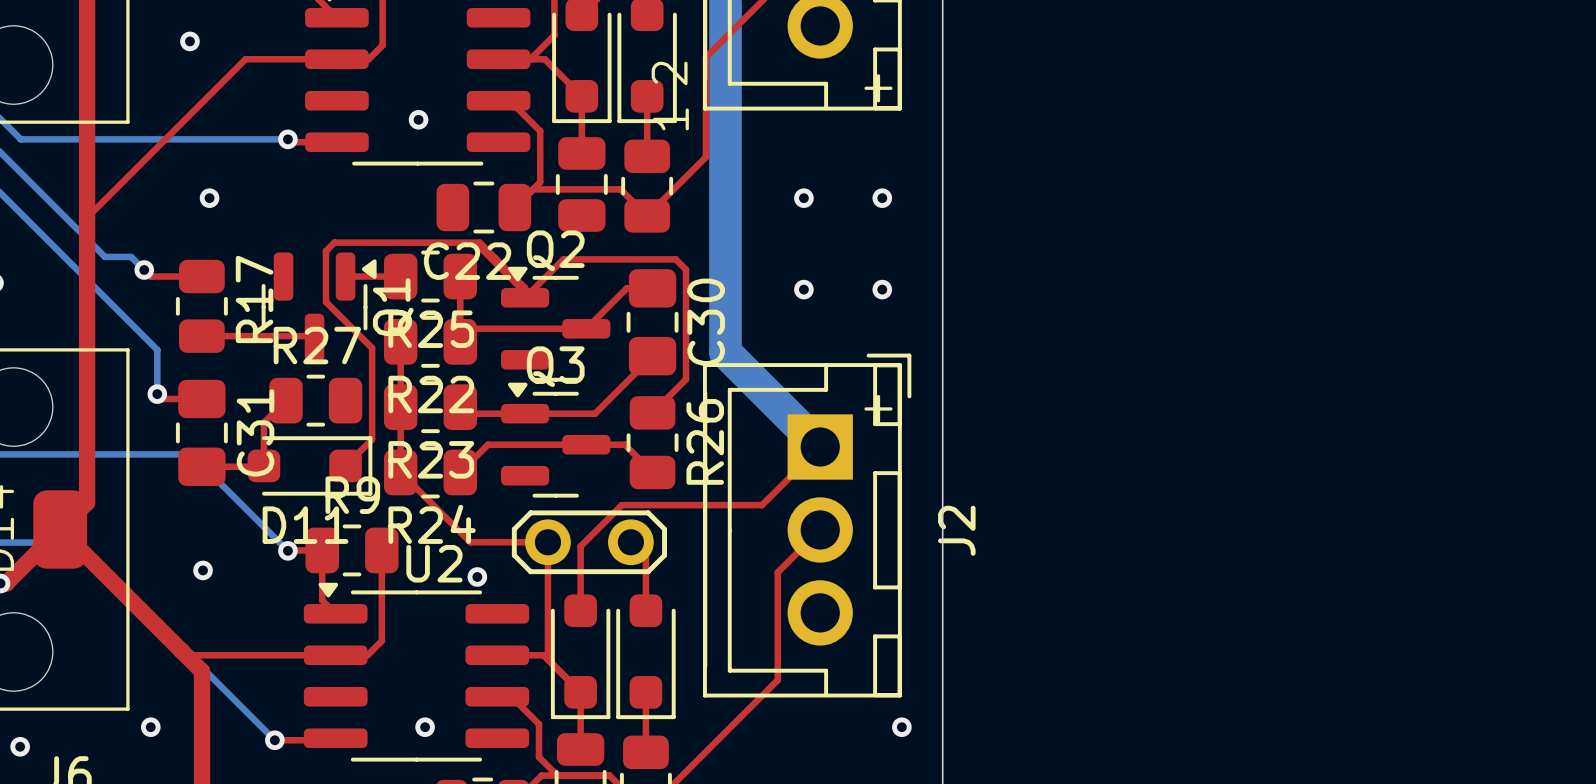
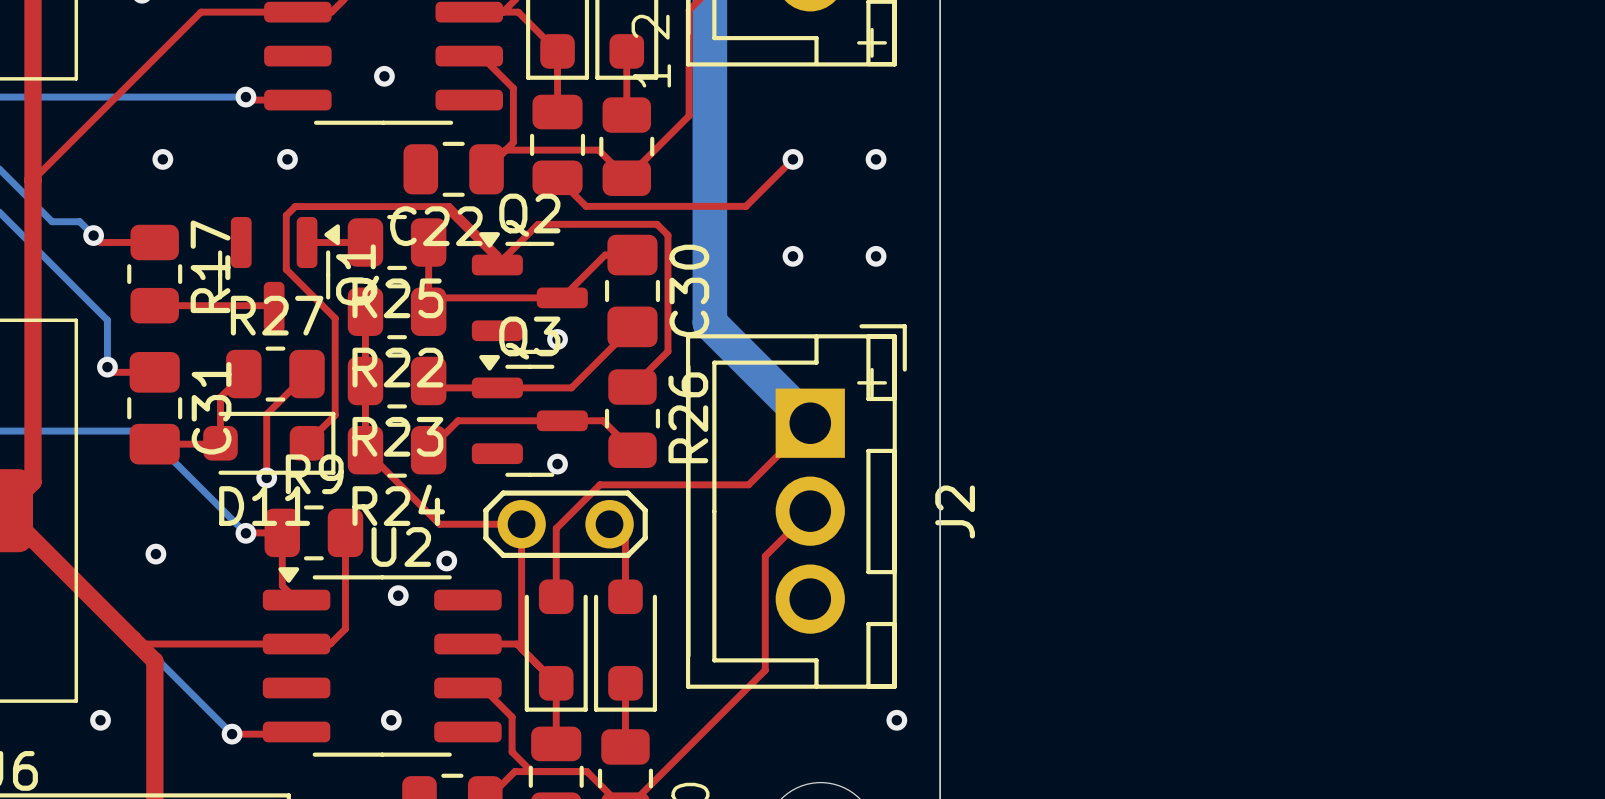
via: none -> (287, 159)
top track: none -> (792, 159) (746, 206) (586, 206) (557, 177)
via: none -> (557, 339)
top track: none -> (307, 374) (266, 414) (266, 477)
via: none -> (557, 464)
via: none -> (266, 477)
via: none -> (398, 595)

